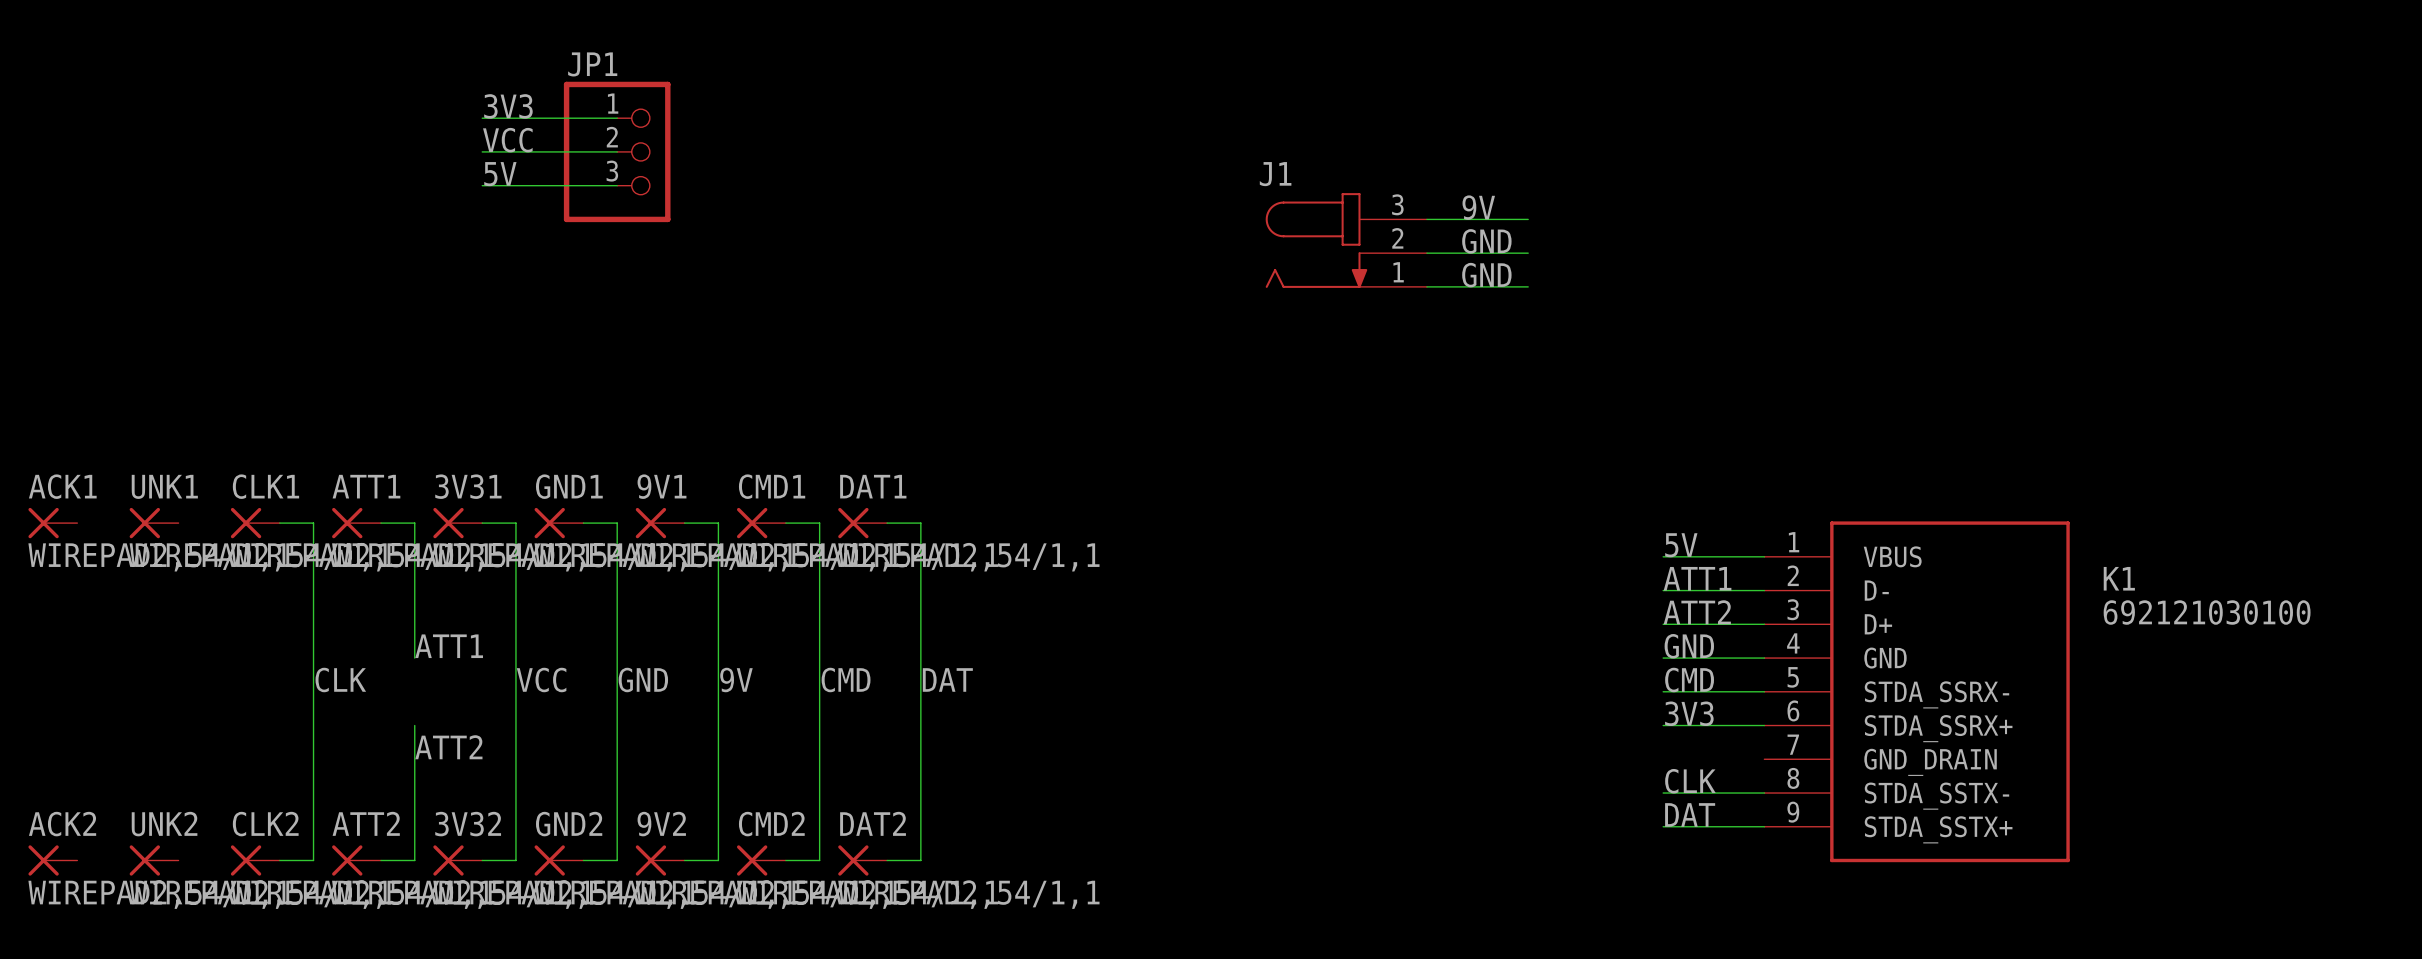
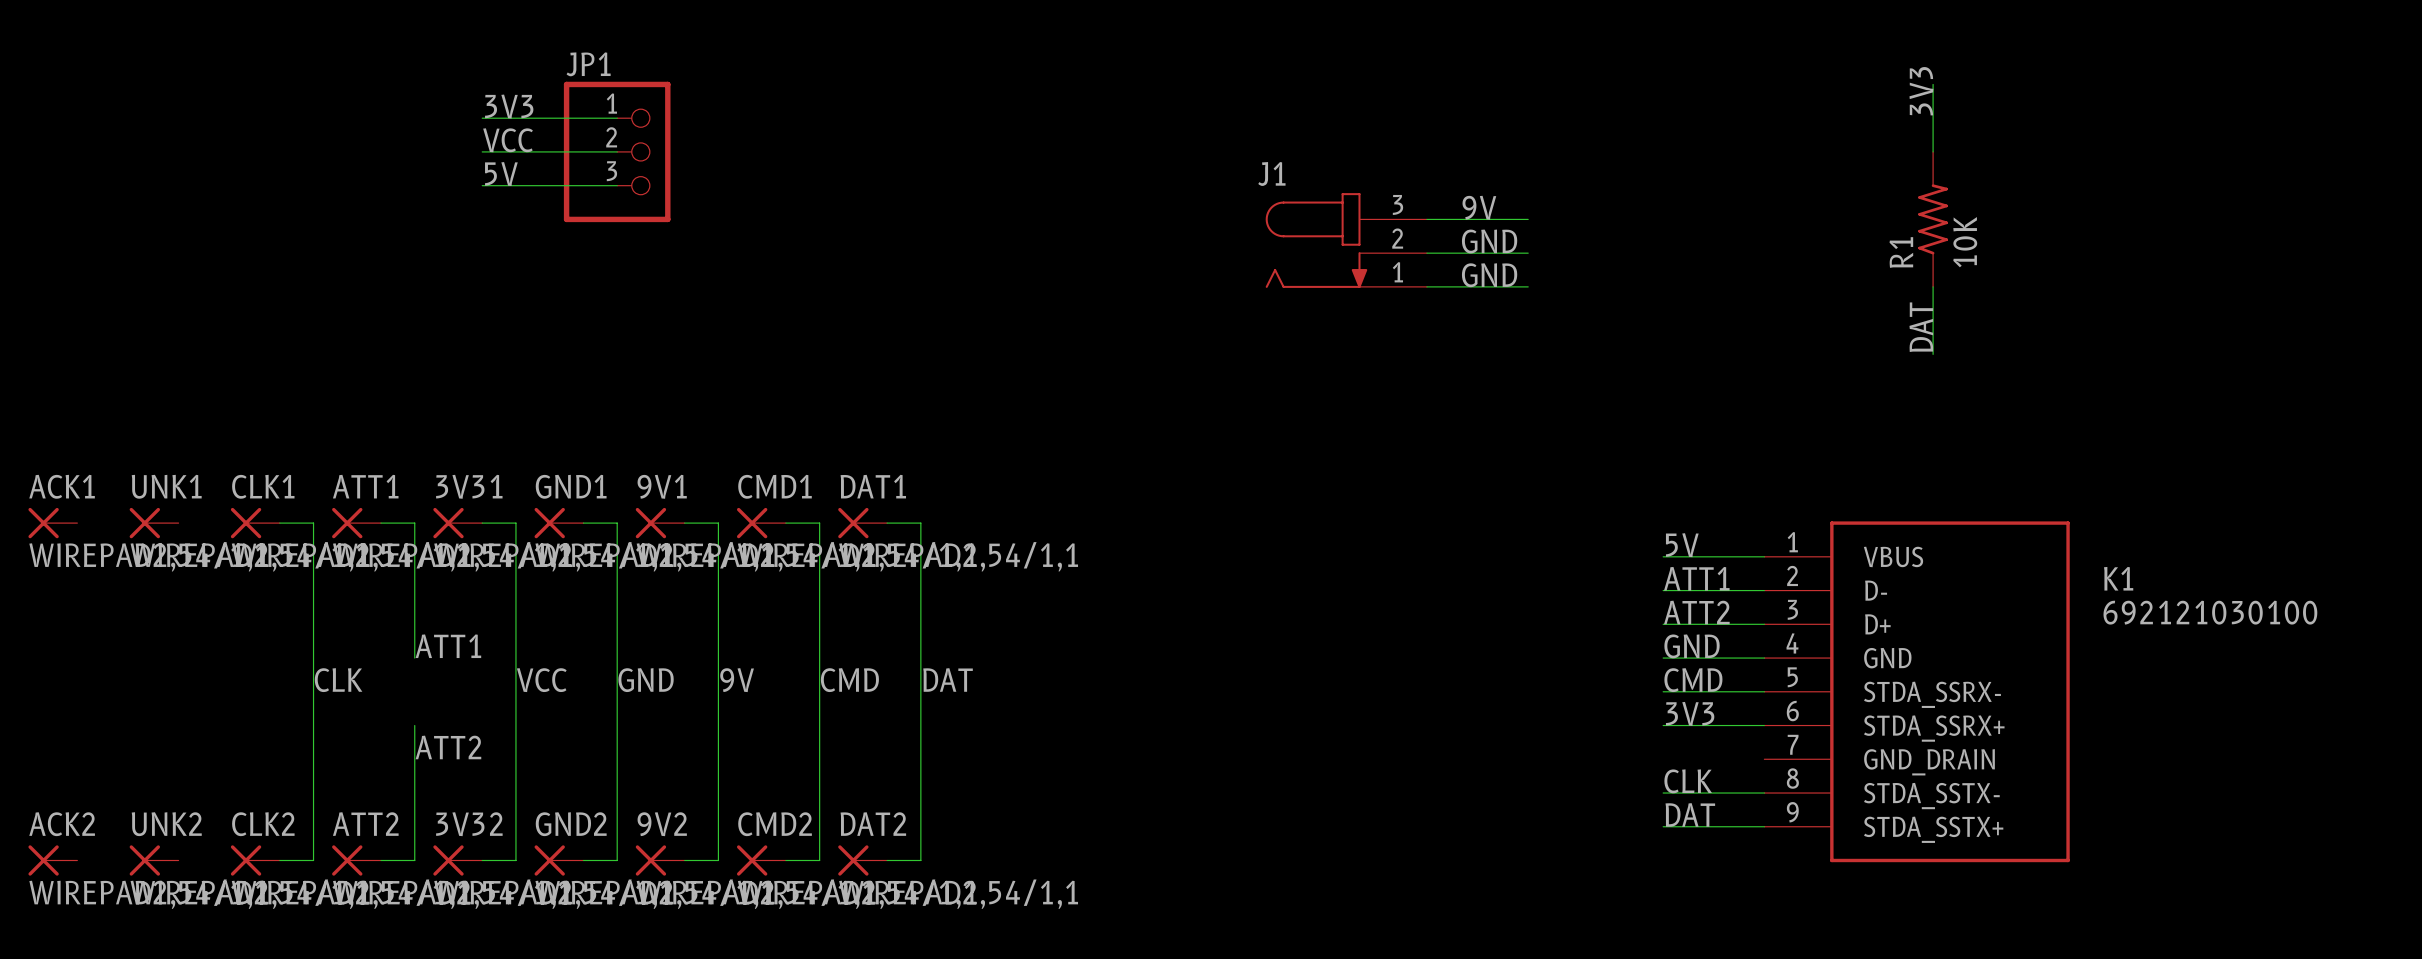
wire: none -> (1933, 84) (1933, 151)
label: none -> 3V3 (1921, 91)
R1: none -> 10K (1933, 219)
wire: none -> (1933, 286) (1933, 354)
label: none -> DAT (1921, 327)

